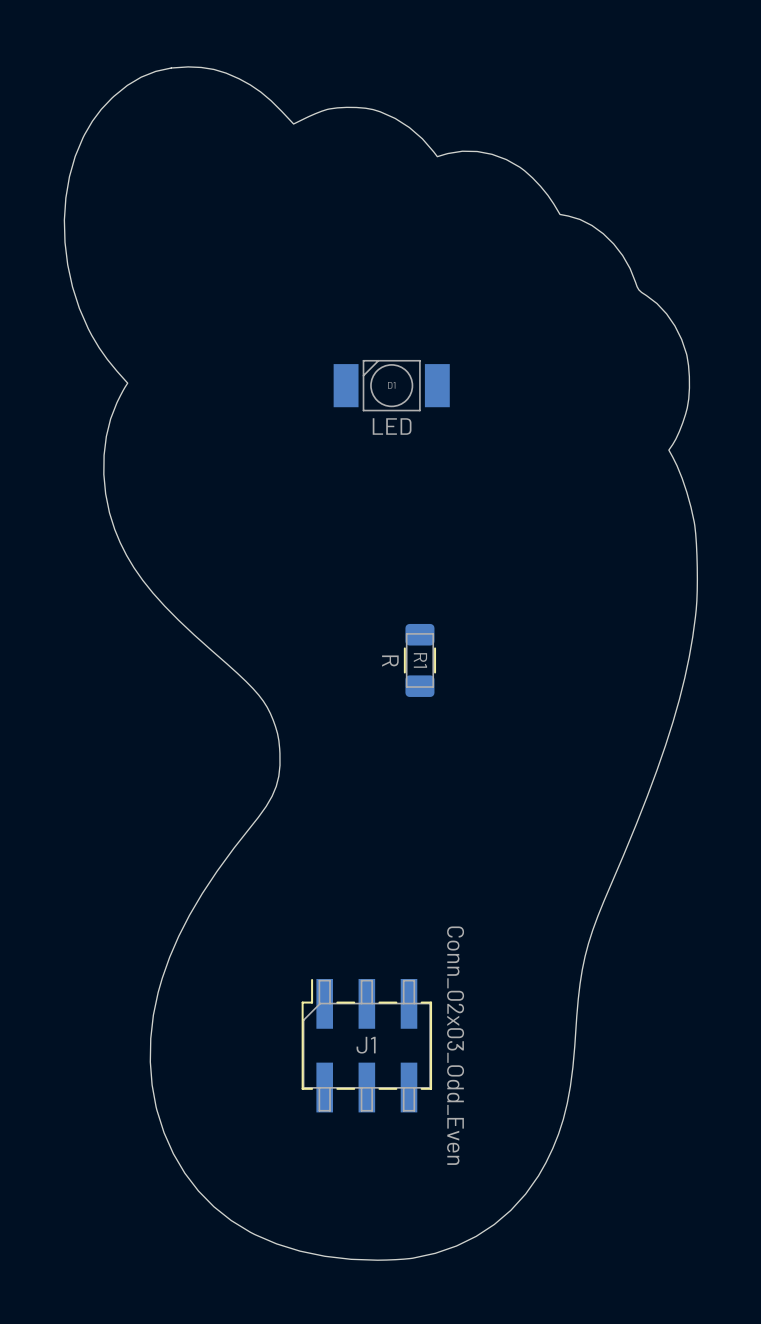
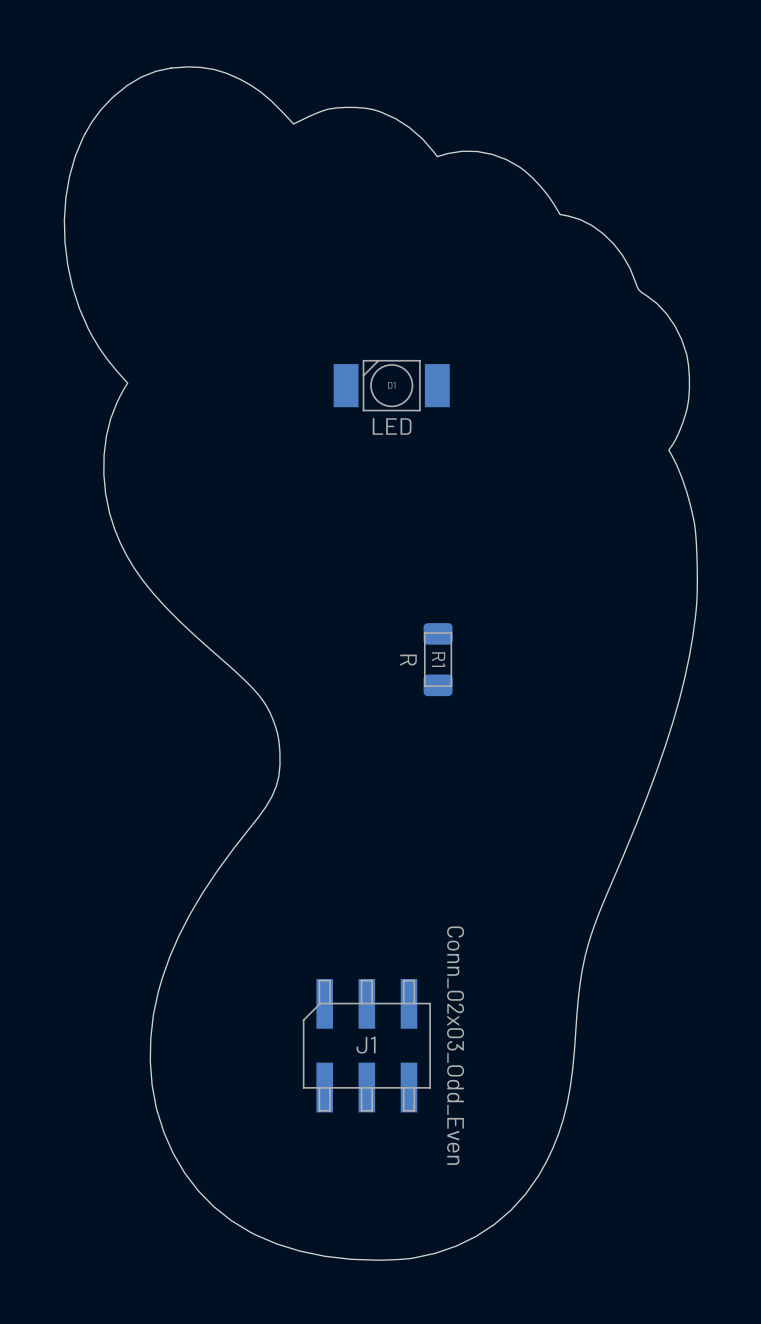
R1 footprint: [403, 623, 437, 697] -> [423, 623, 453, 697]
J1 footprint: [301, 978, 433, 1113] -> [302, 978, 431, 1113]

